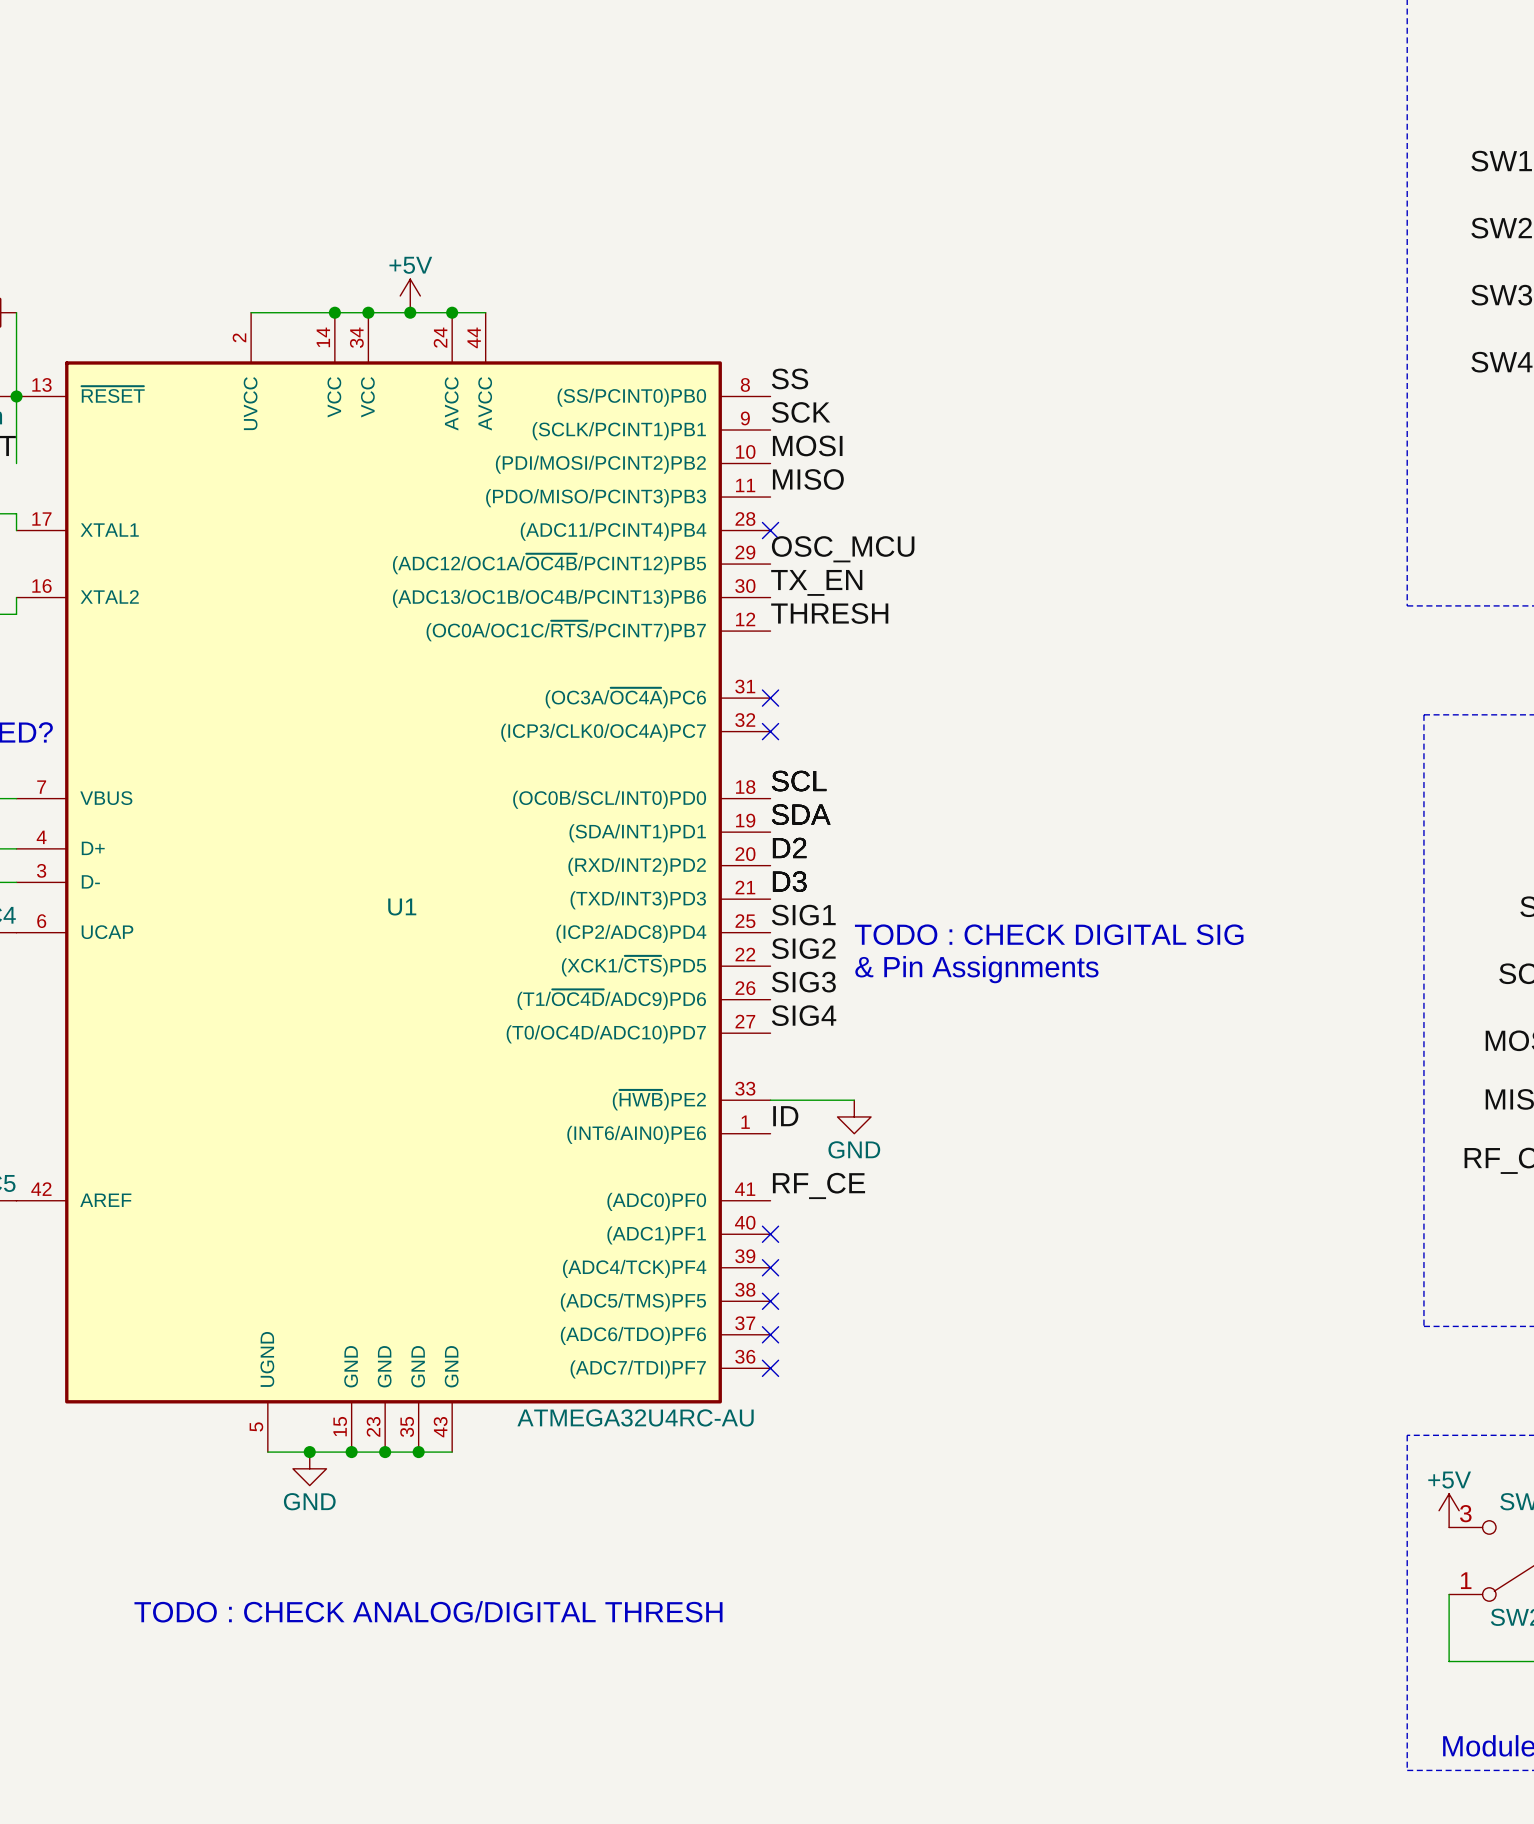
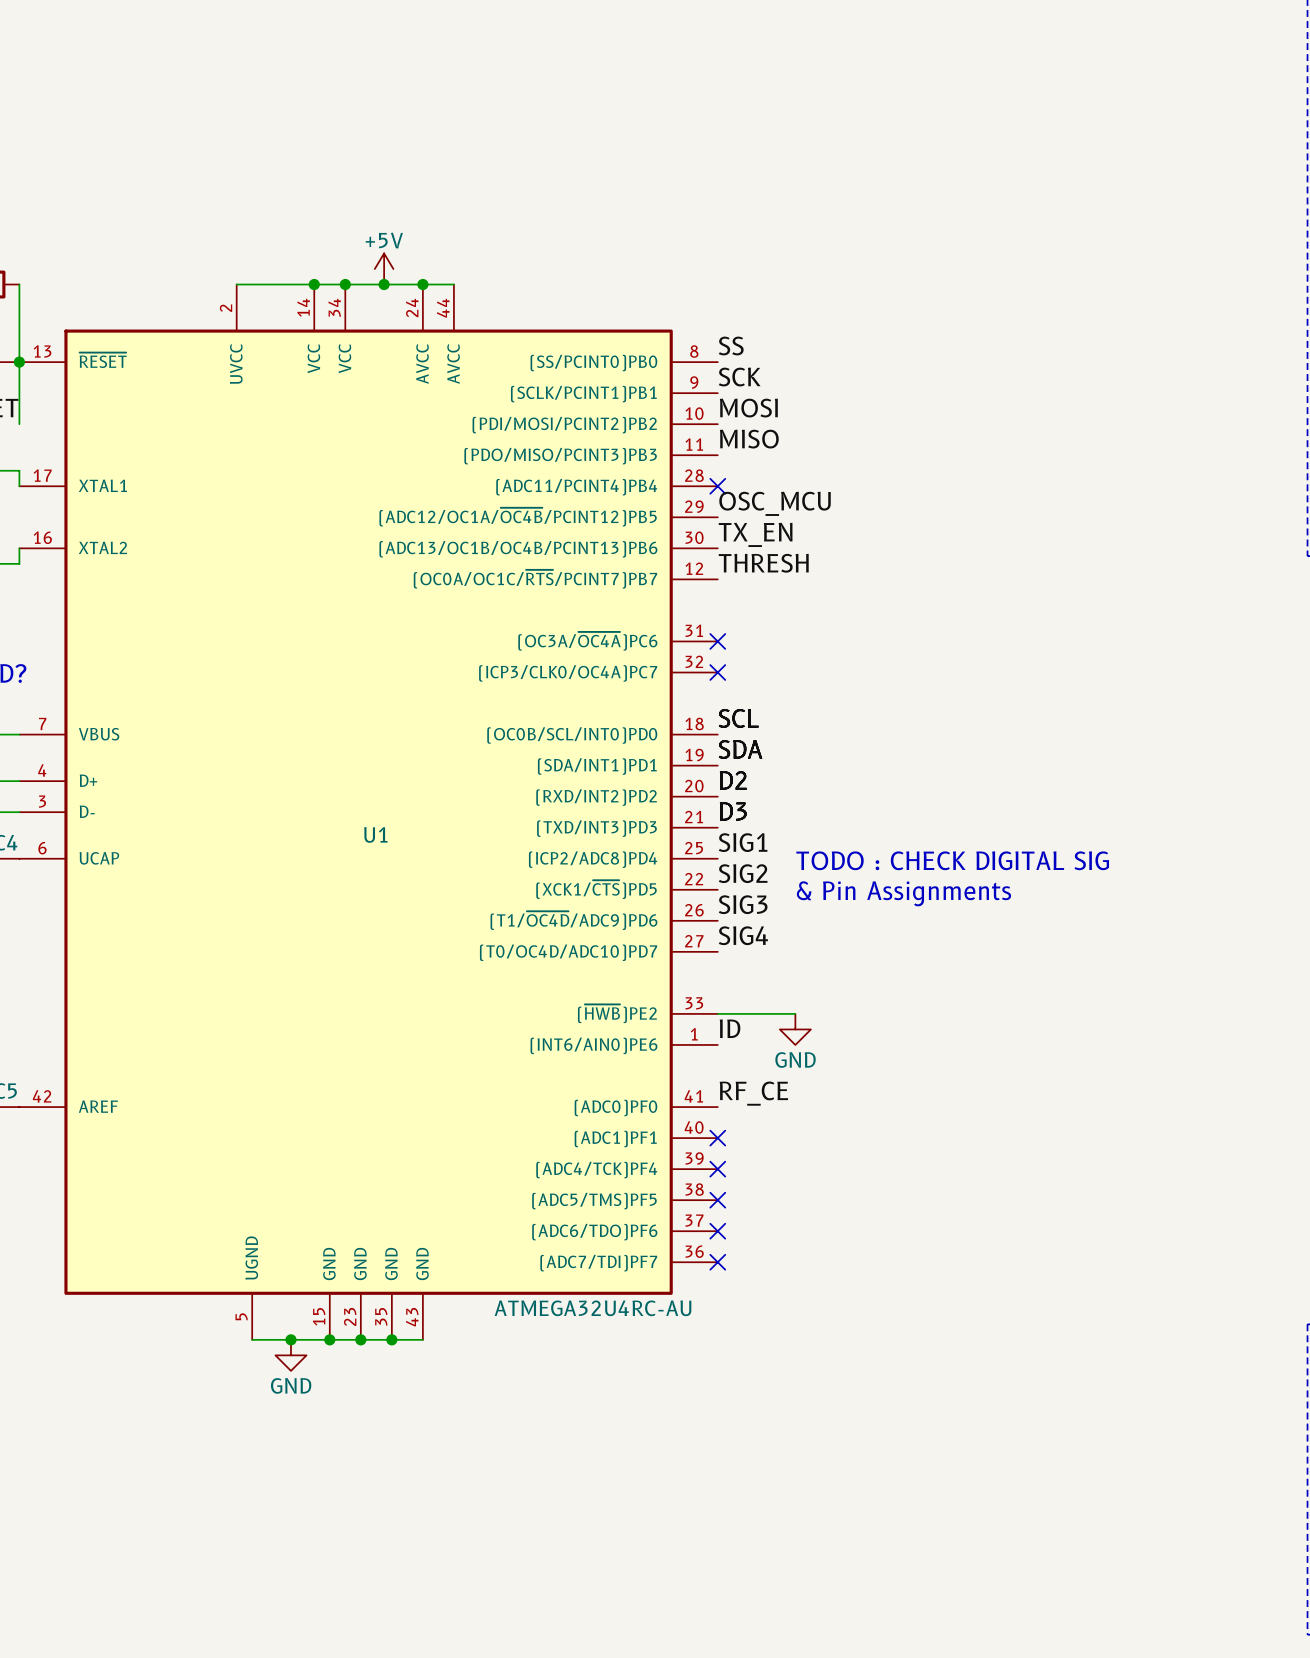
text: TODO : CHECK ANALOG/DIGITAL THRESH (428, 1611) -> none

